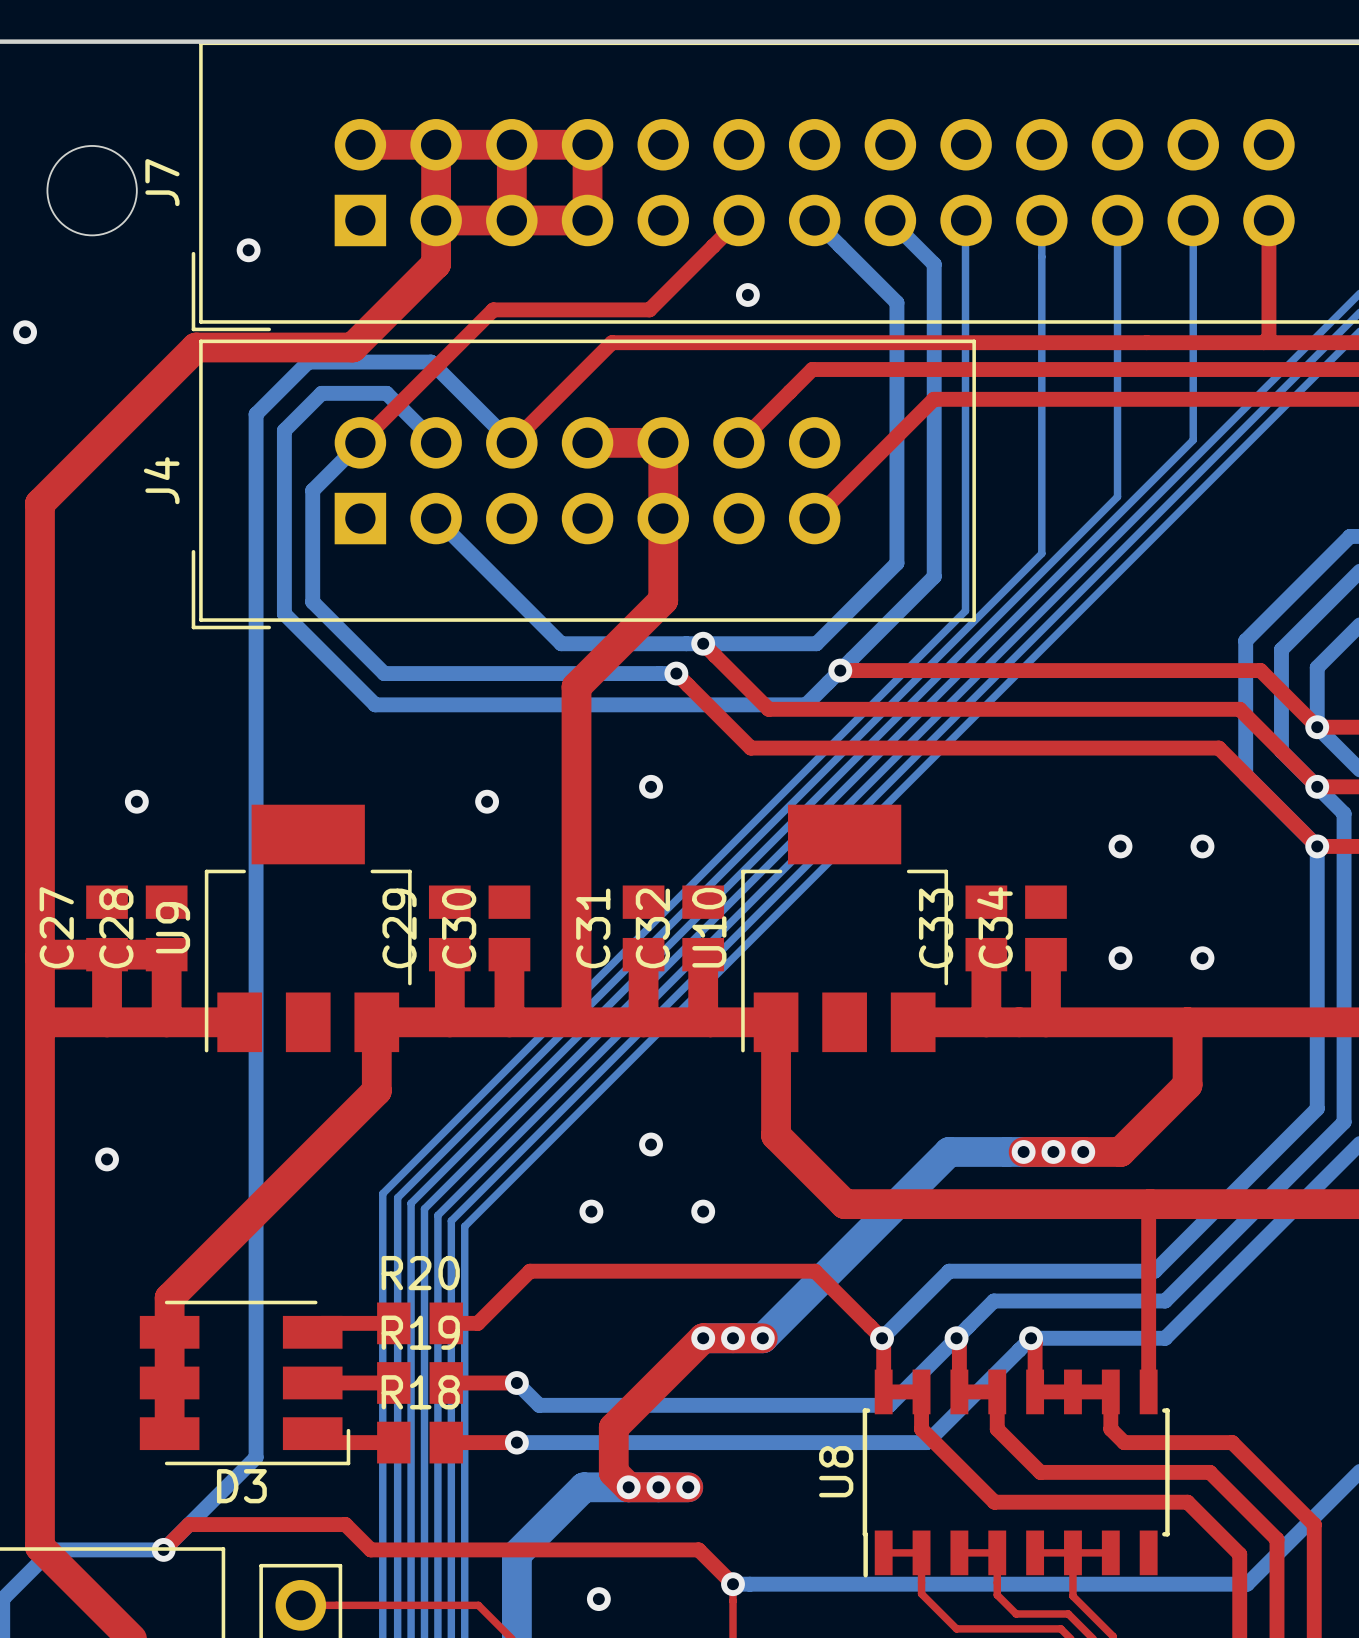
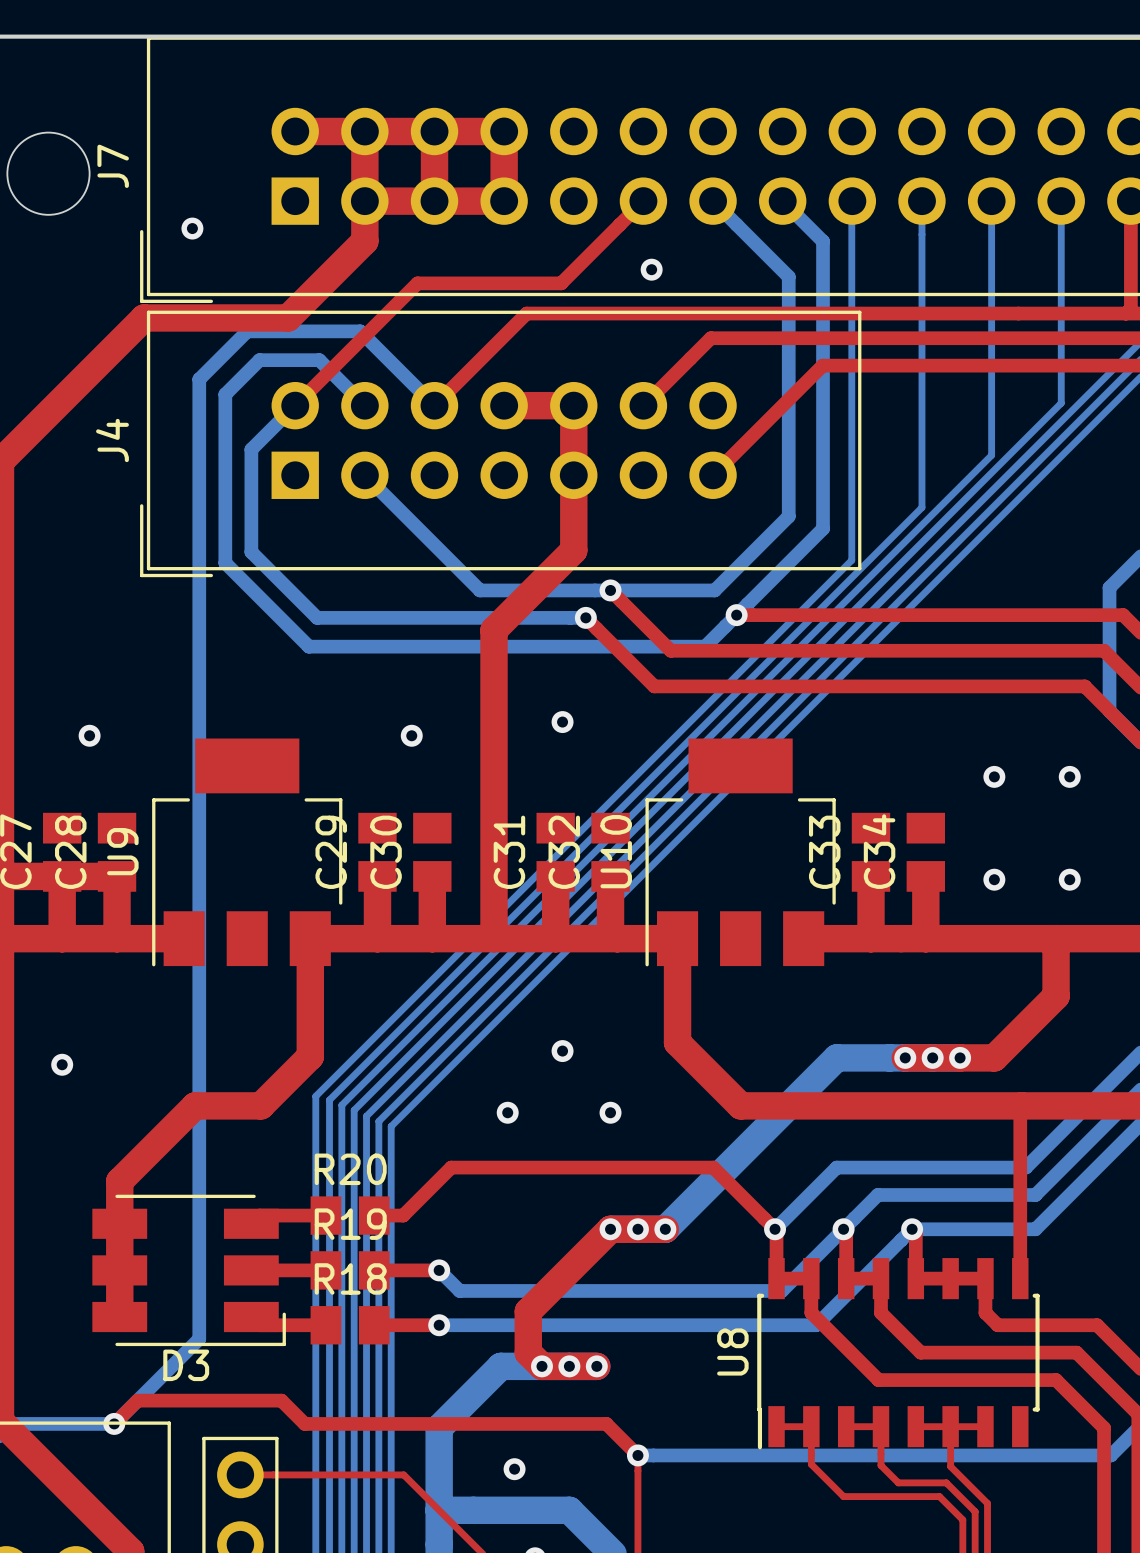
top track: (376, 1090) (169, 1298) -> (310, 1001) (310, 1056) (260, 1105) (195, 1105) (119, 1181) (119, 1192)

